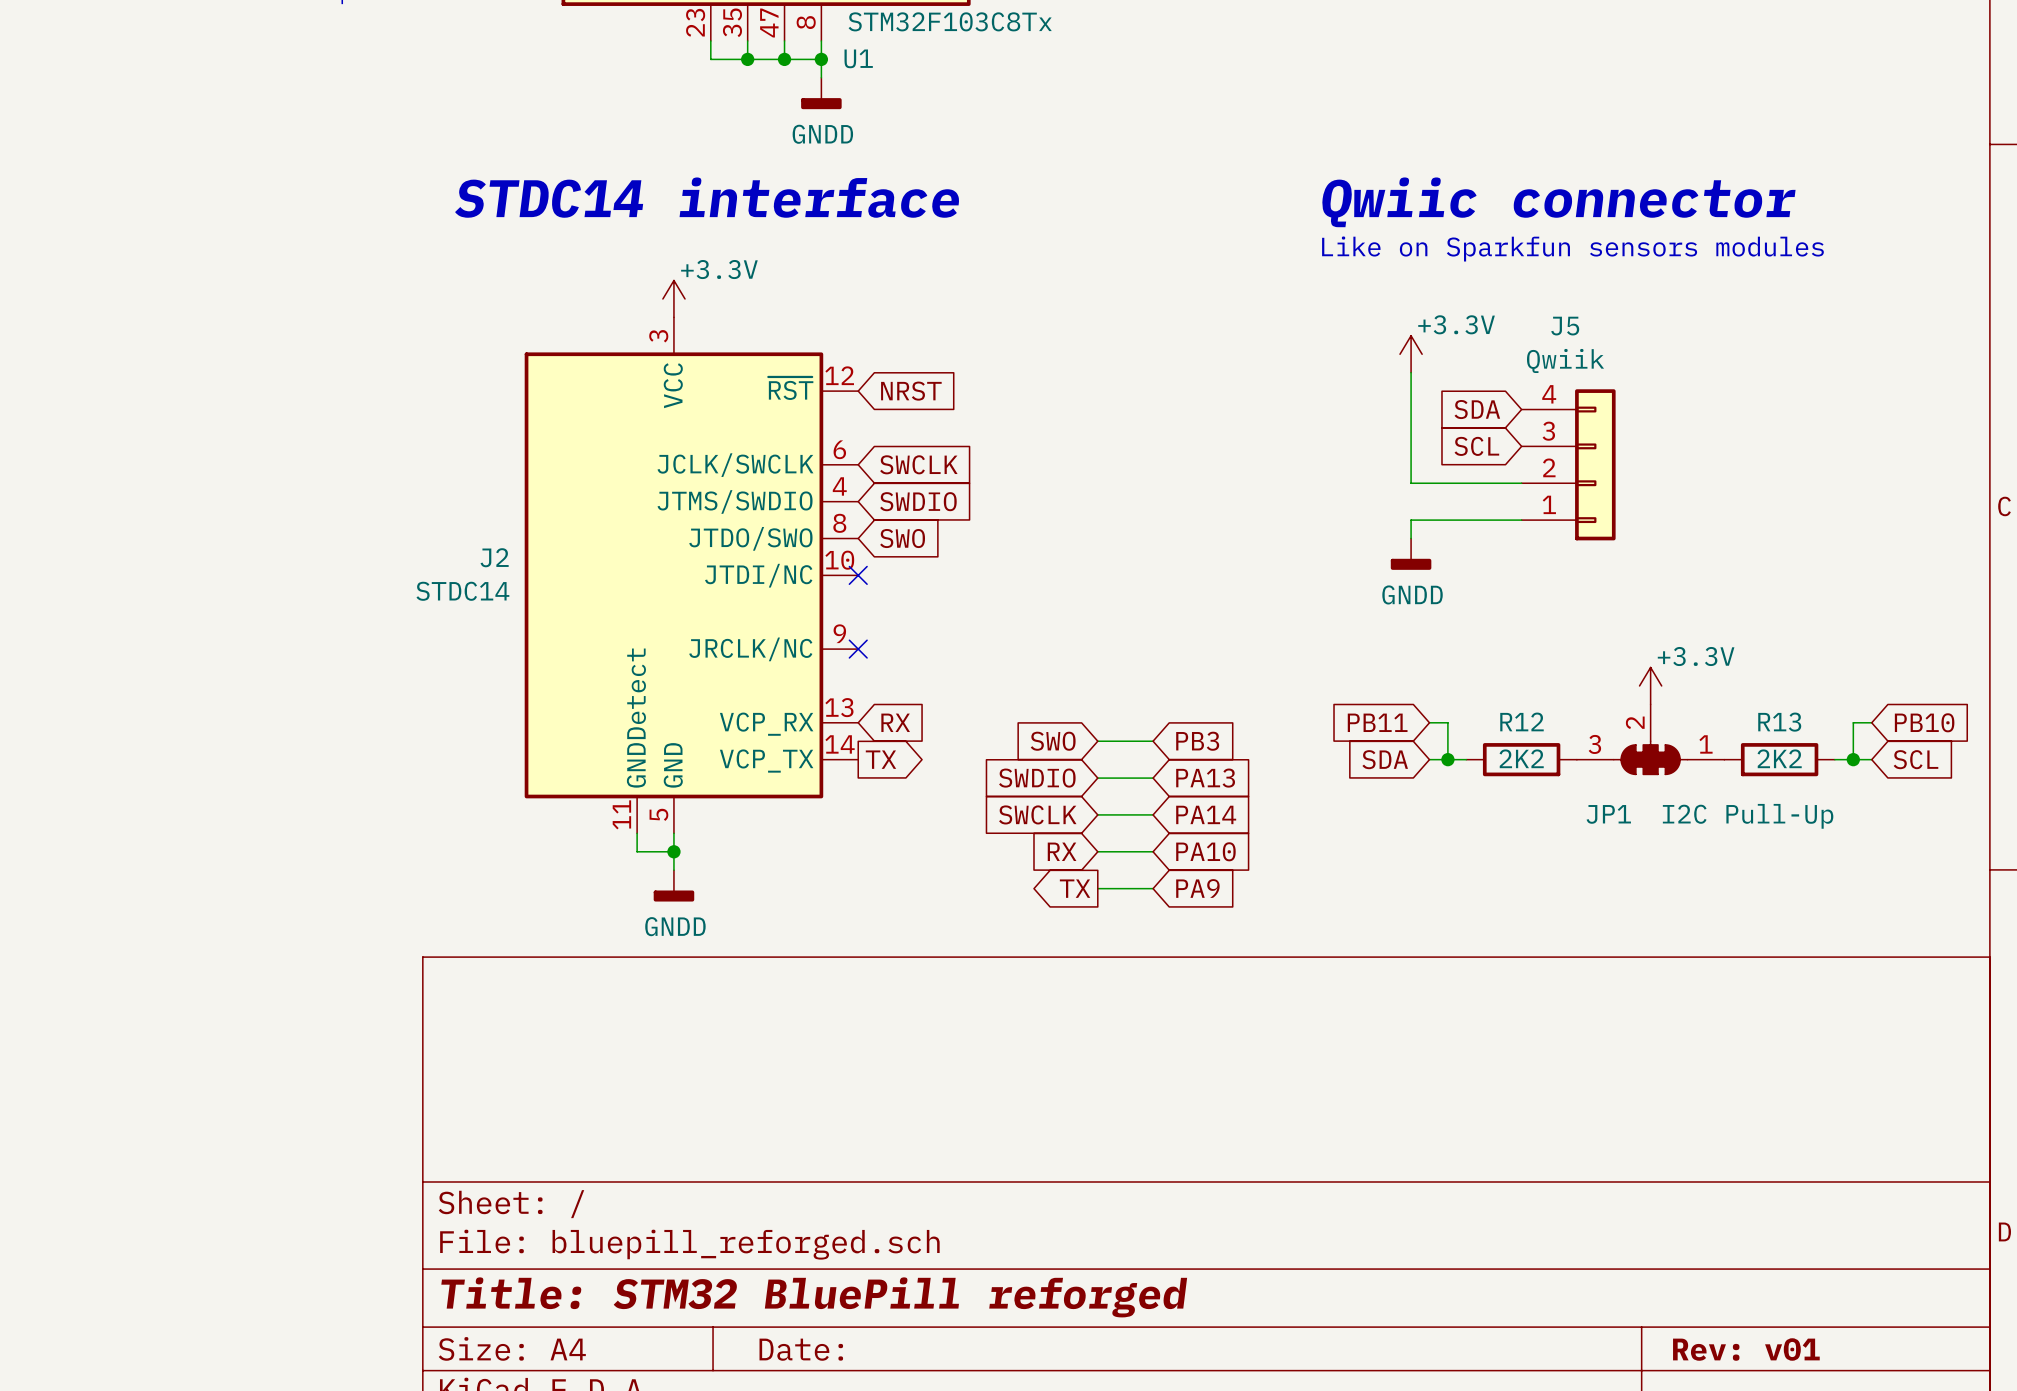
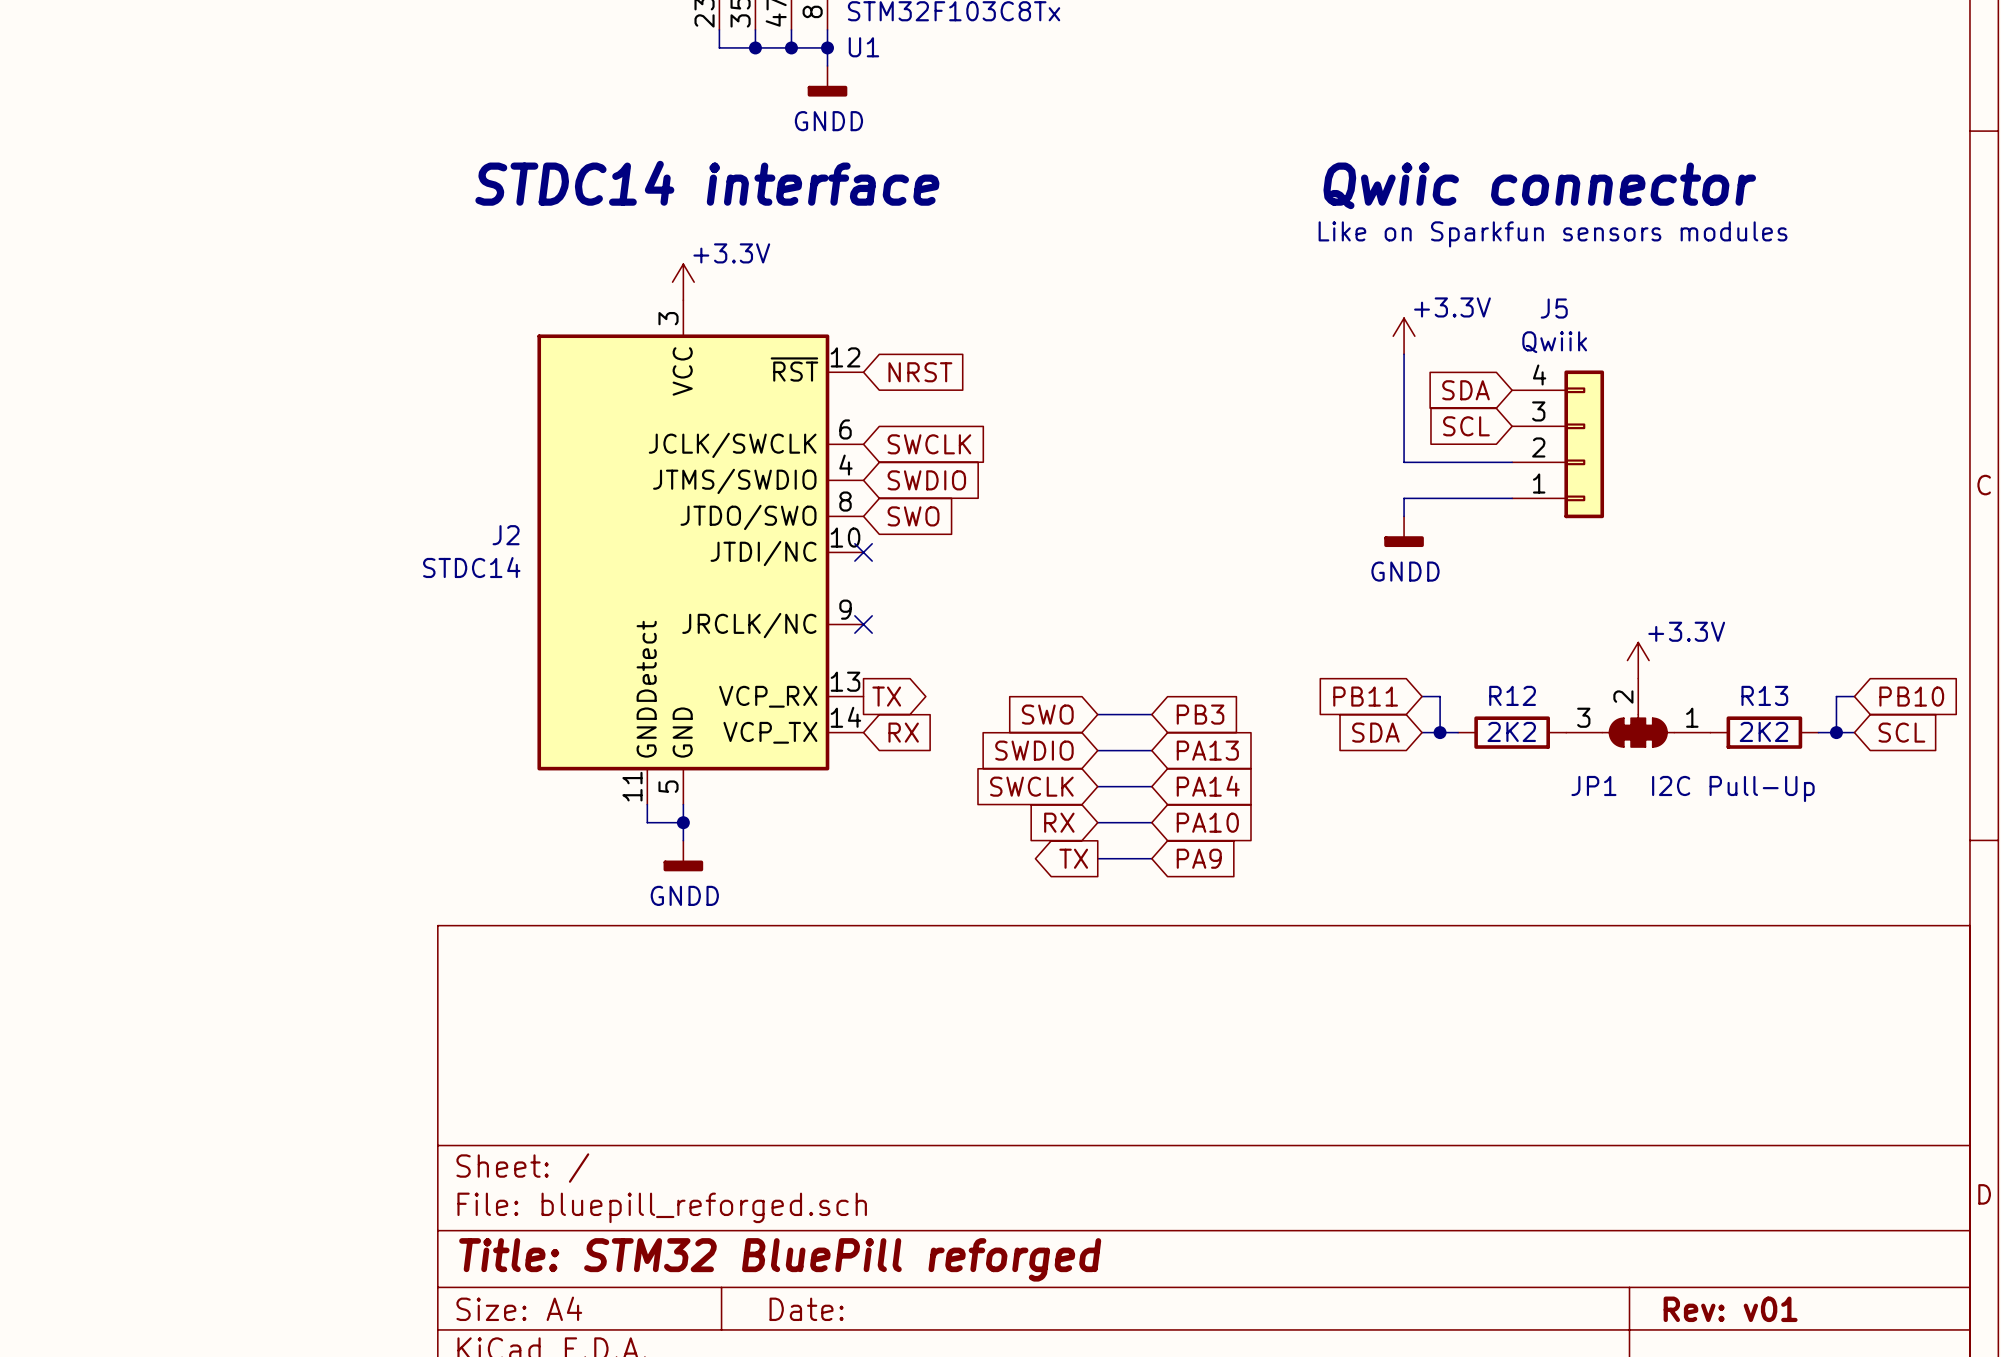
global label shape: input (895, 722) -> output (886, 696)
global label: RX (895, 722) -> TX (886, 696)
global label shape: output (880, 759) -> input (903, 732)
global label: TX (880, 759) -> RX (903, 732)

